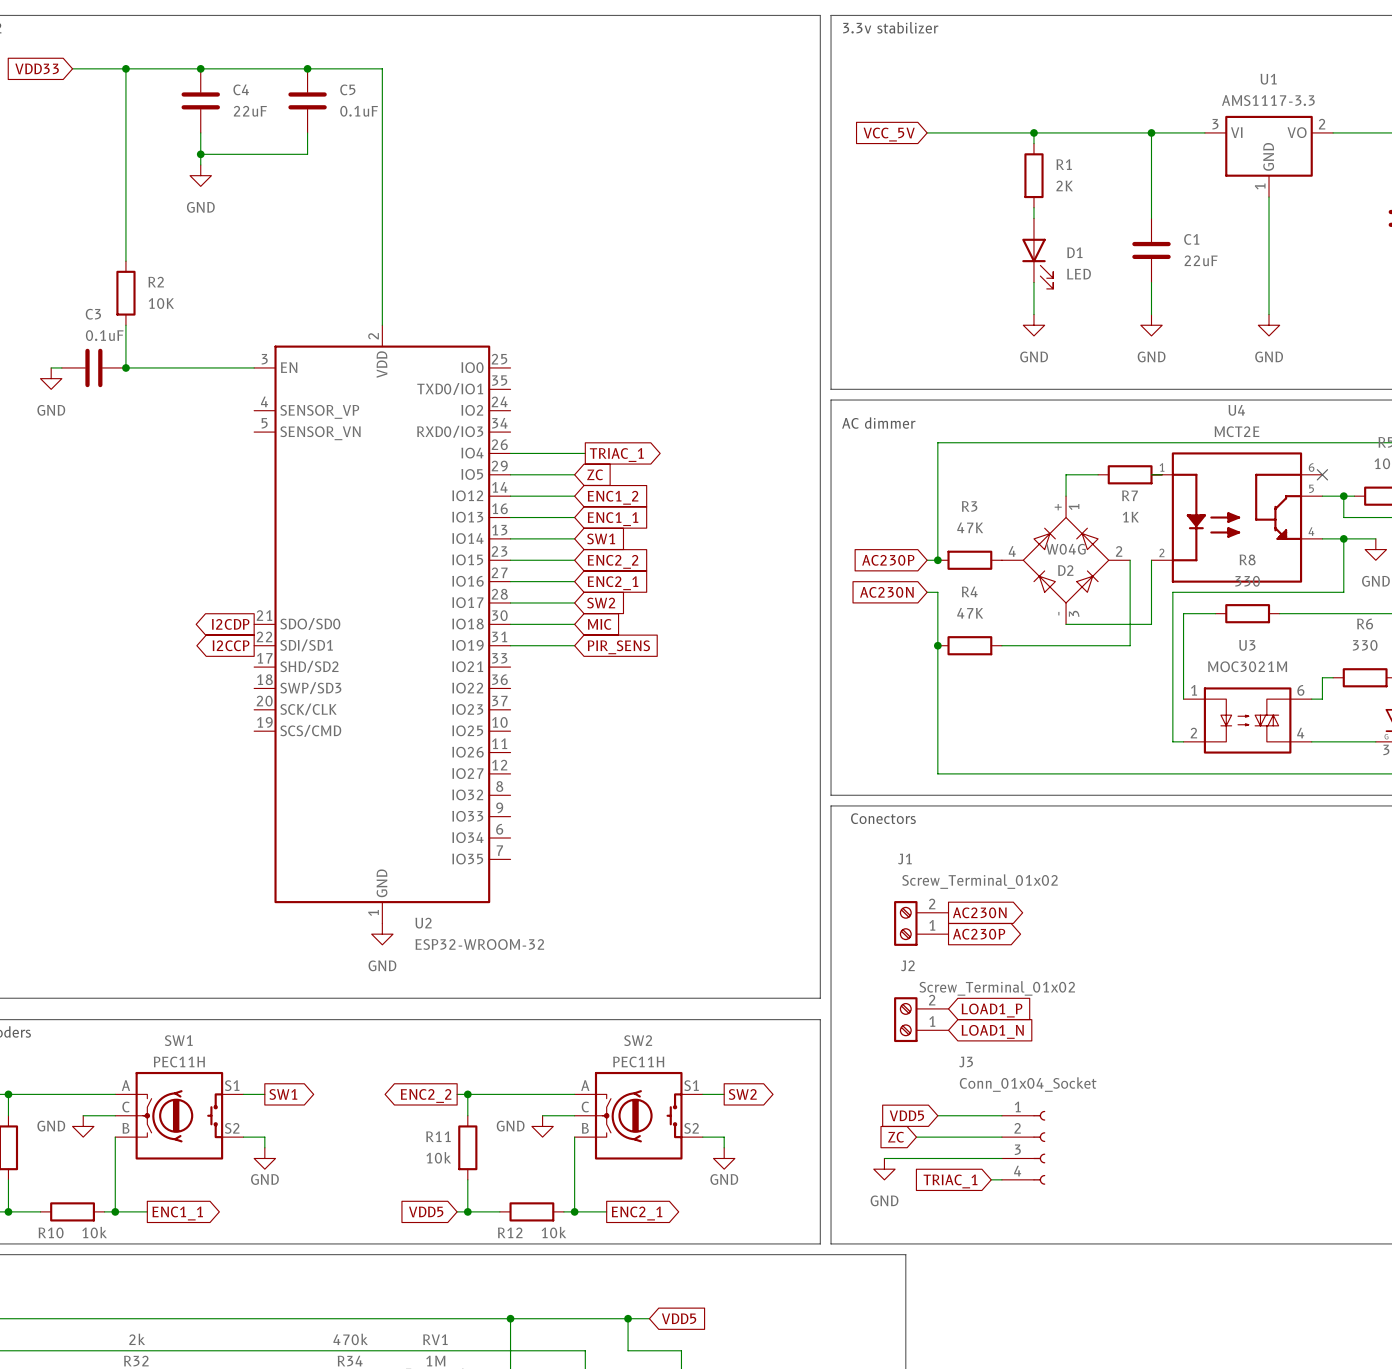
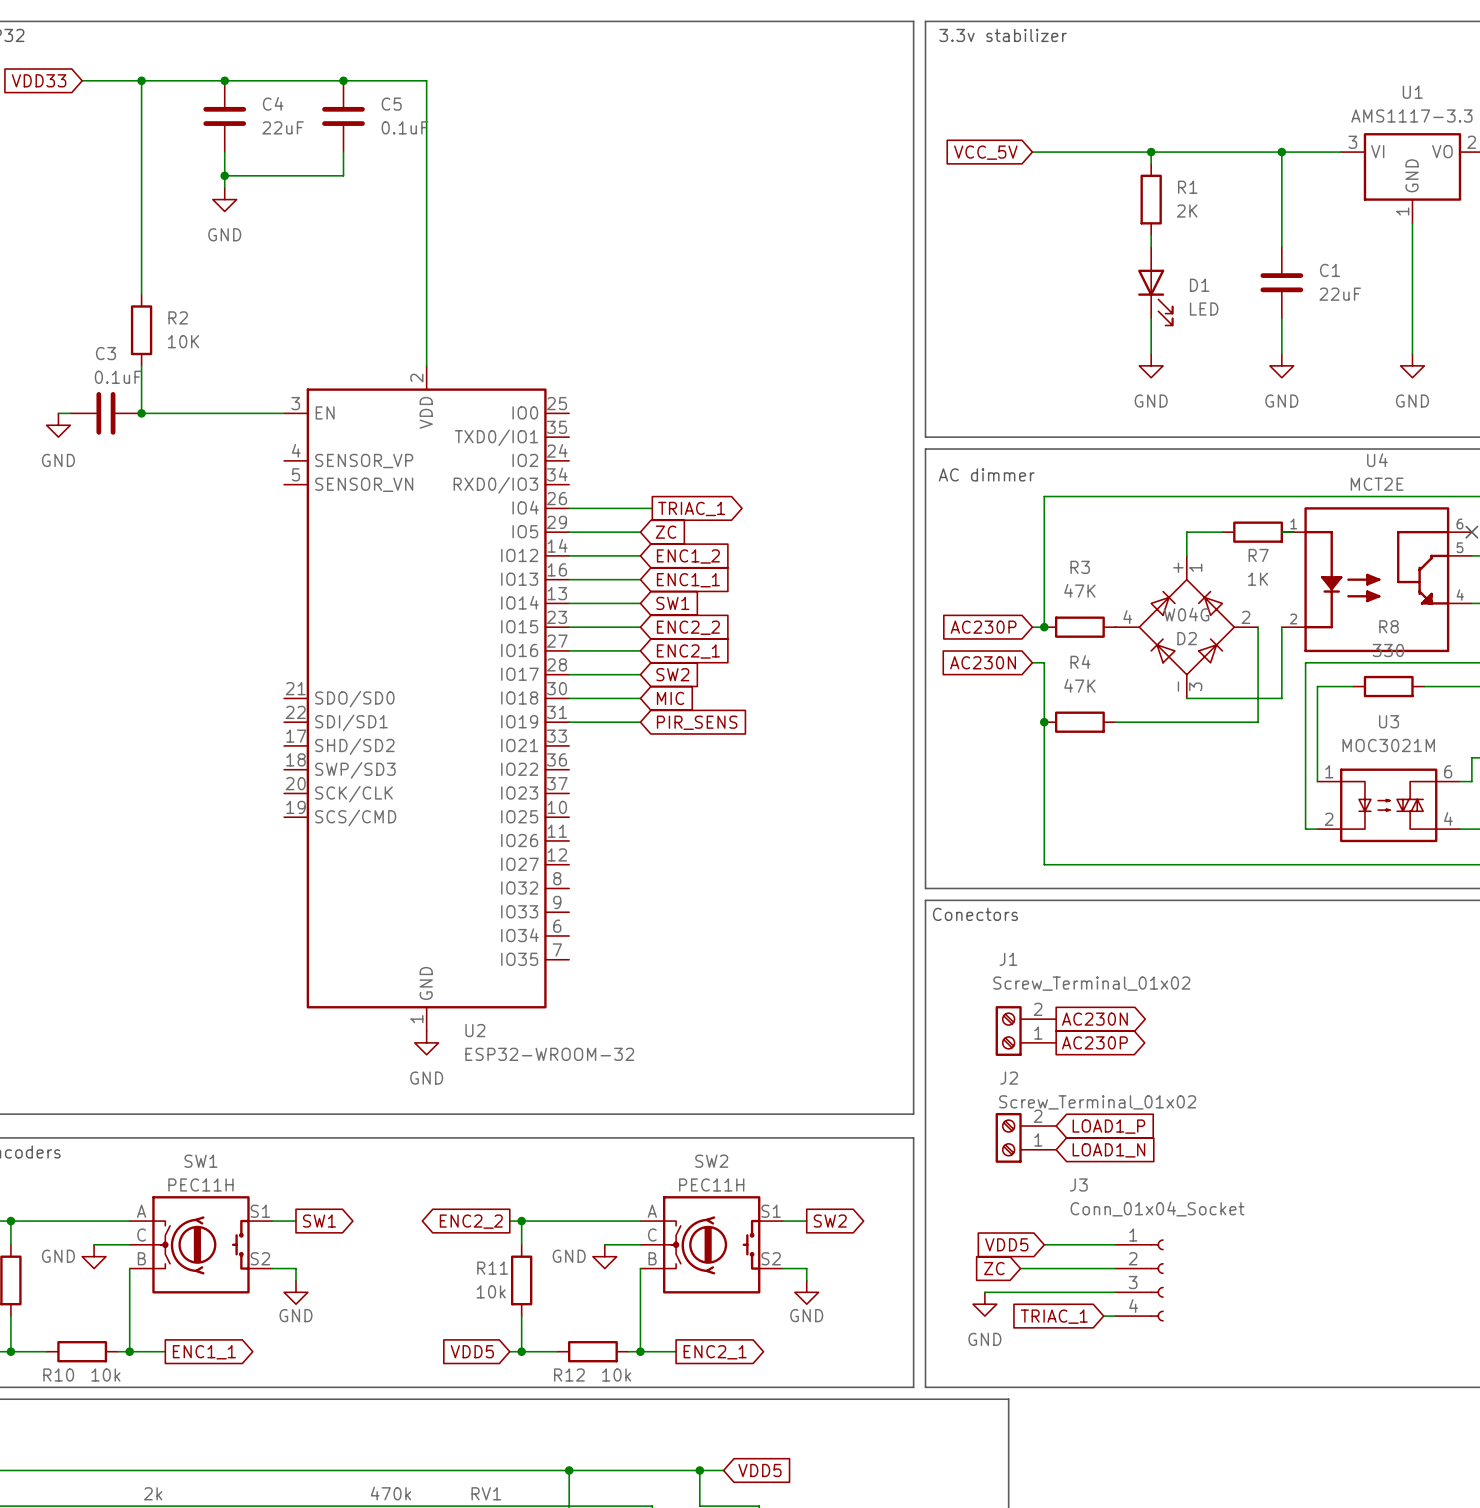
global label: I2CDP (230, 624) -> none
global label: I2CCP (231, 645) -> none

